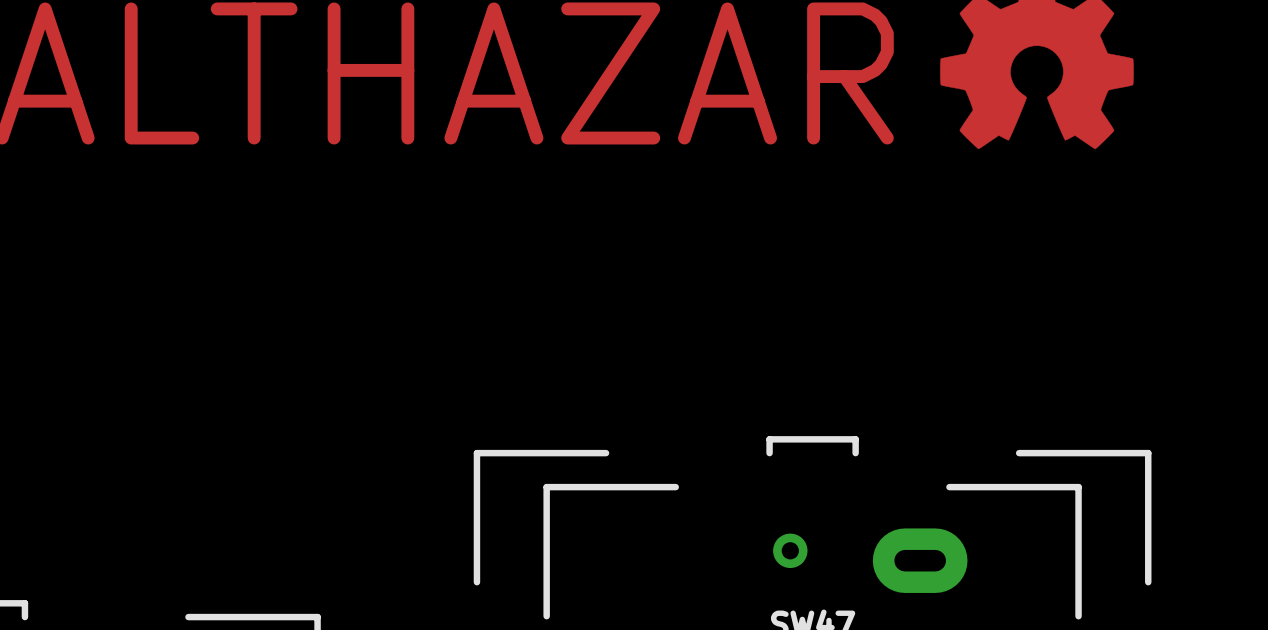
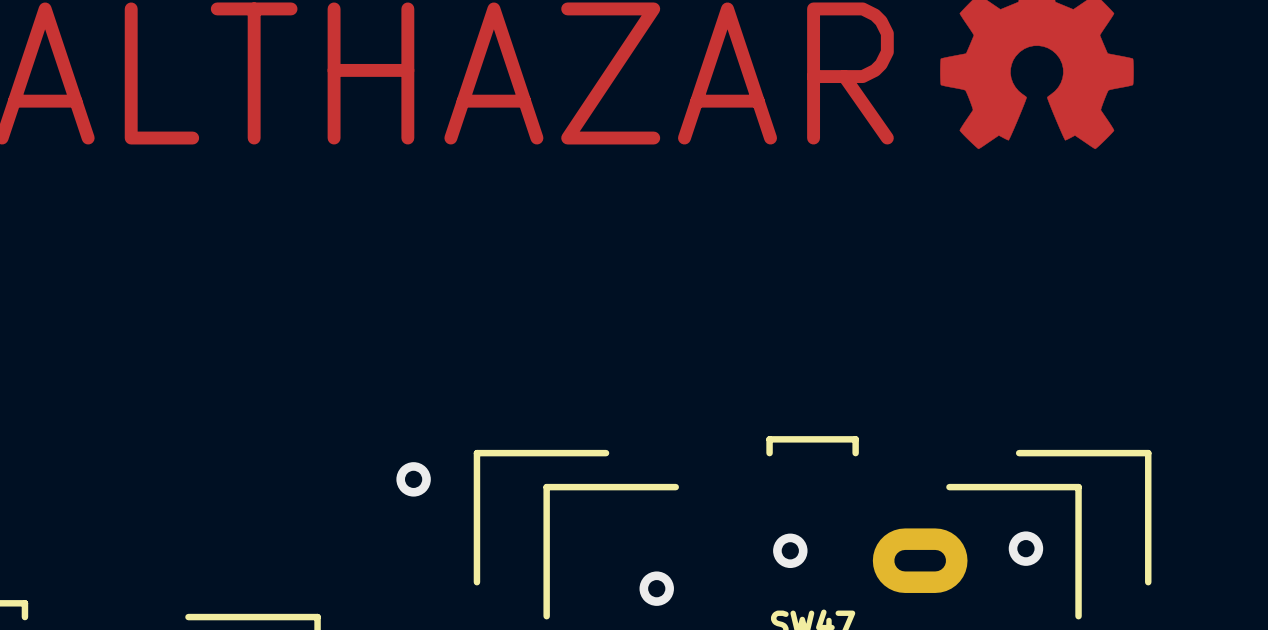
via: none -> (413, 479)
via: none -> (1025, 548)
via: none -> (656, 588)

